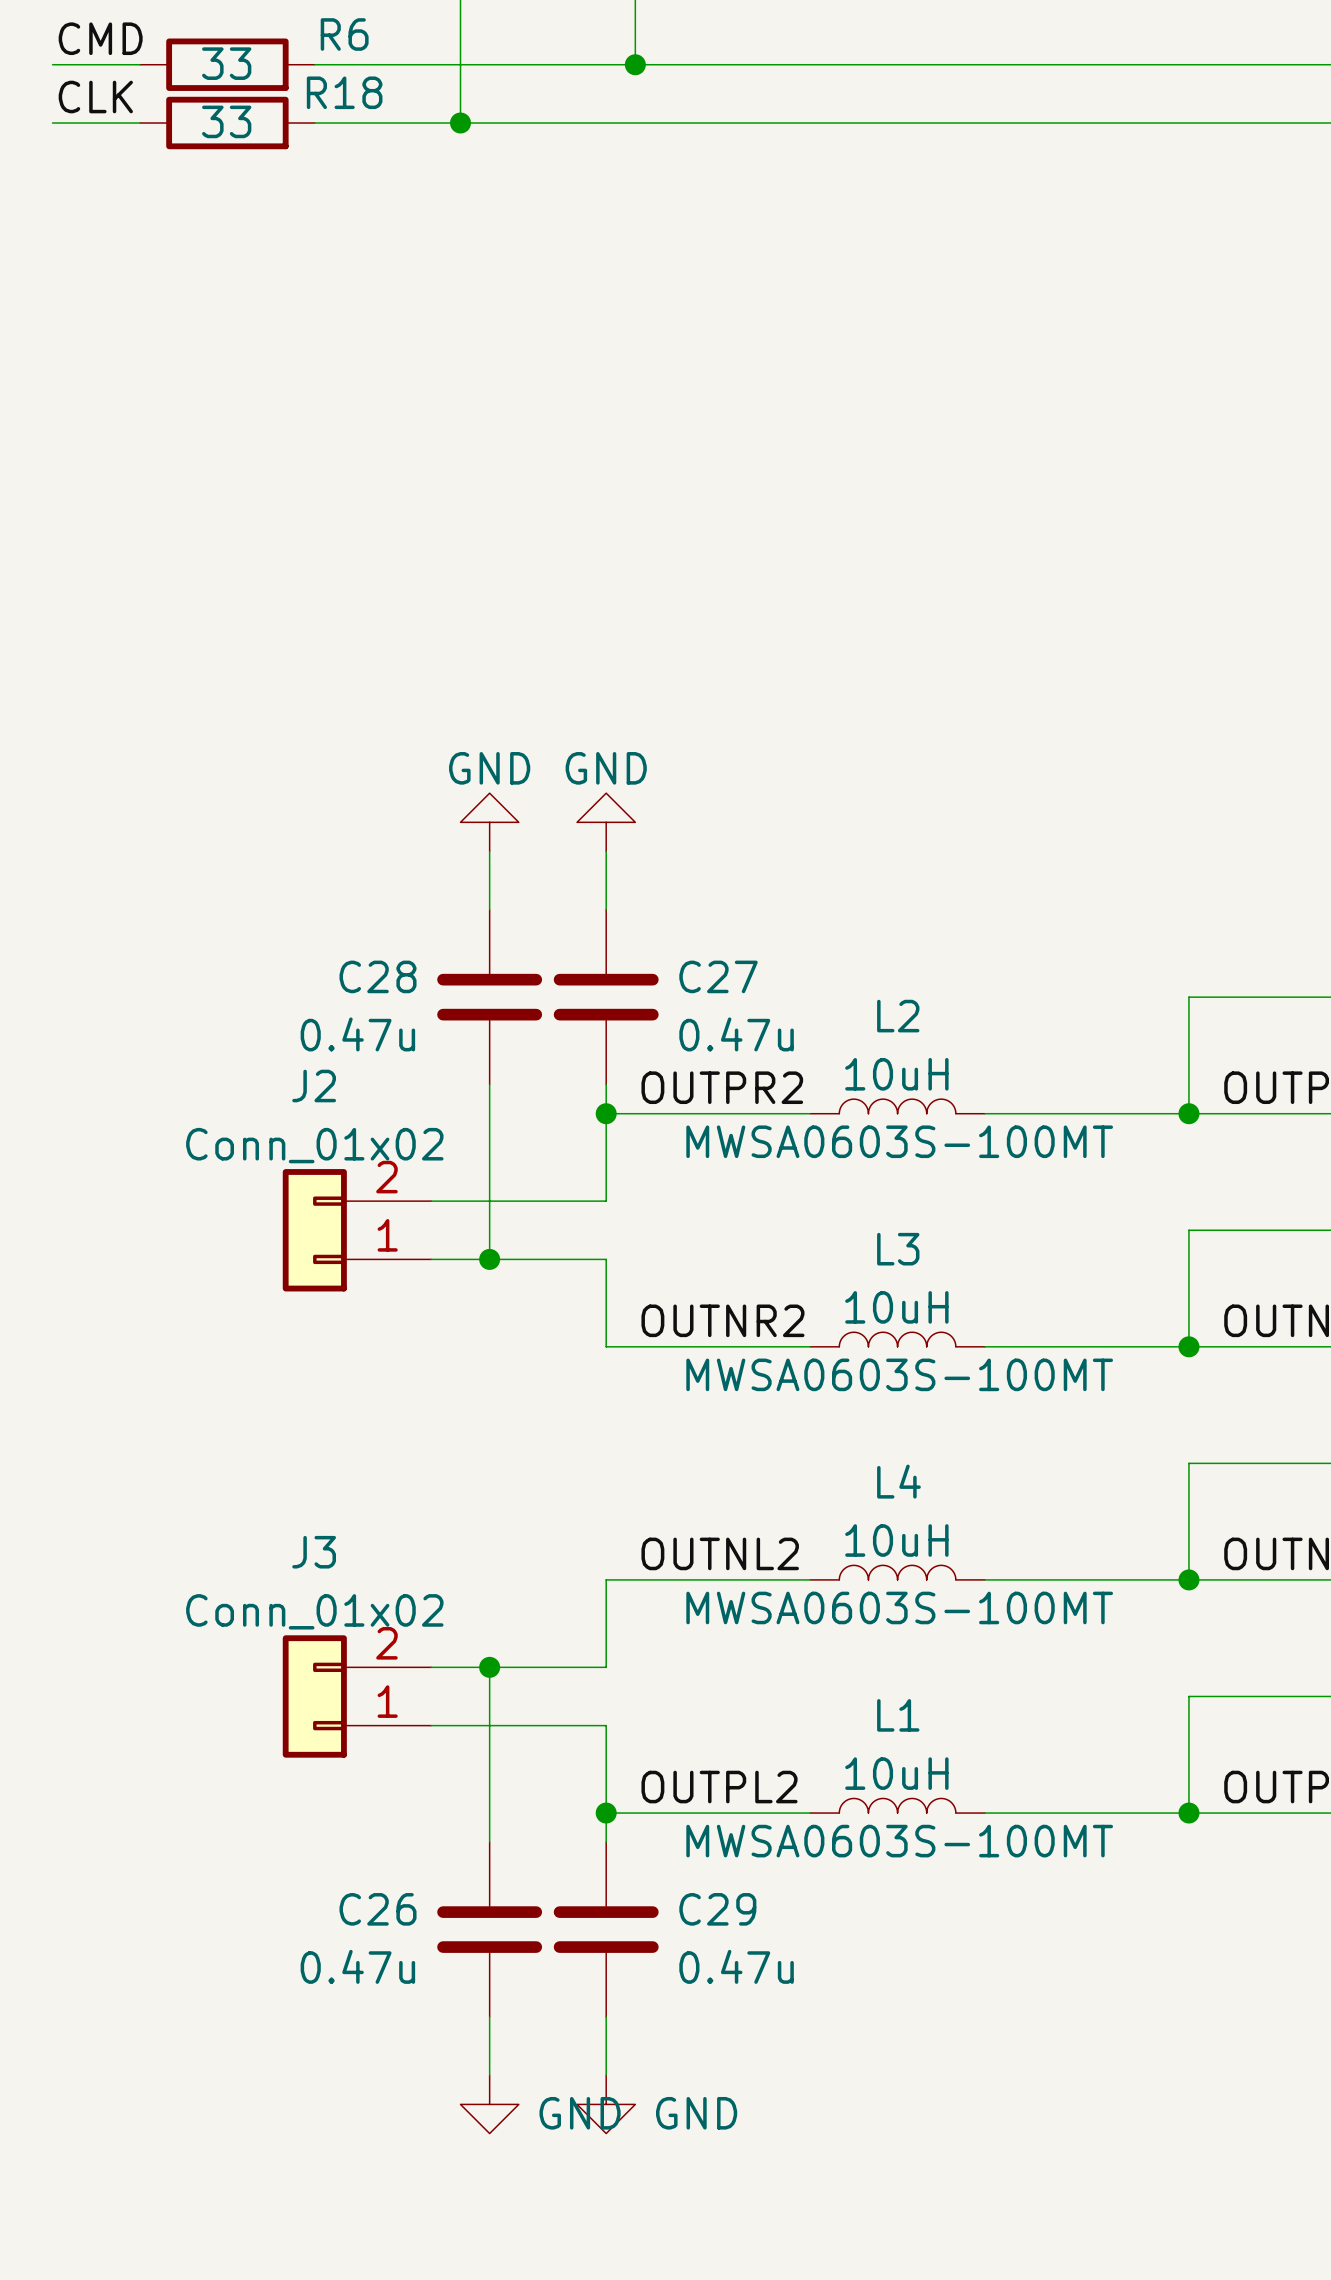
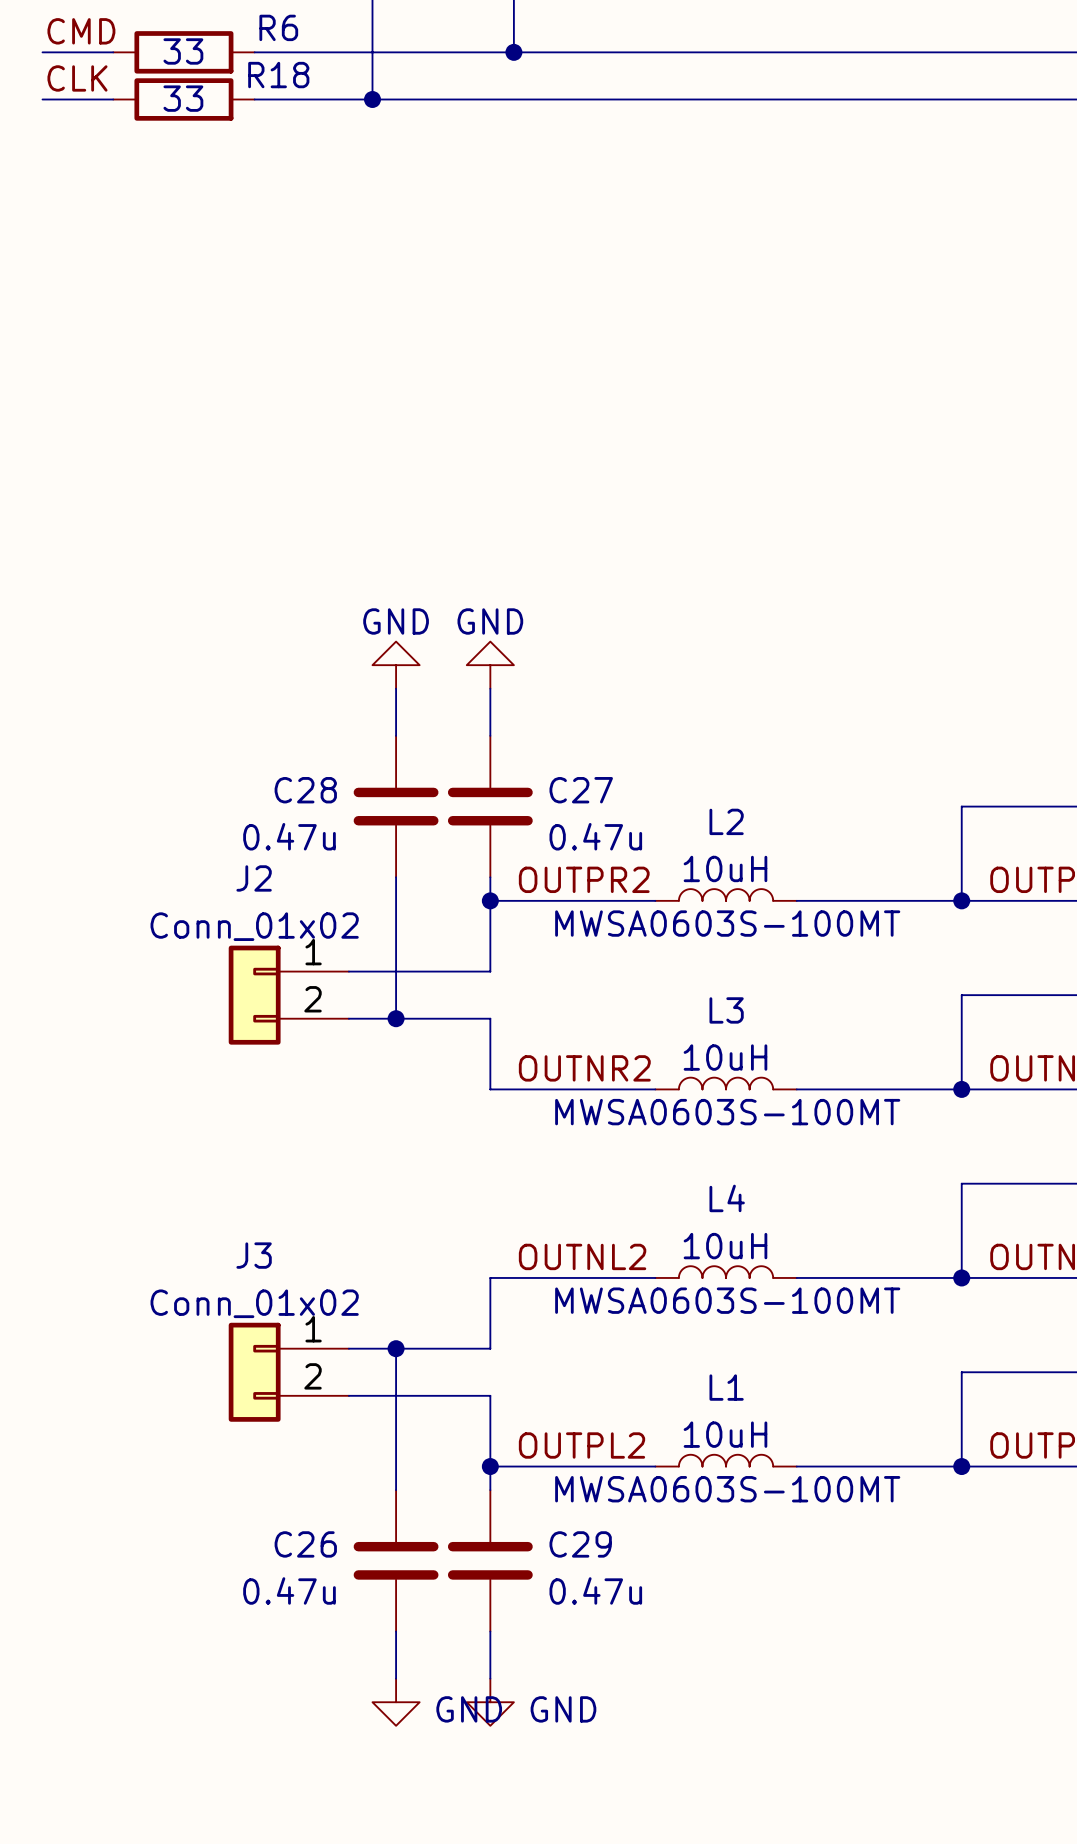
J2 flip: as is (314, 1230) -> up-down (254, 995)
J3 flip: as is (314, 1696) -> up-down (254, 1372)

